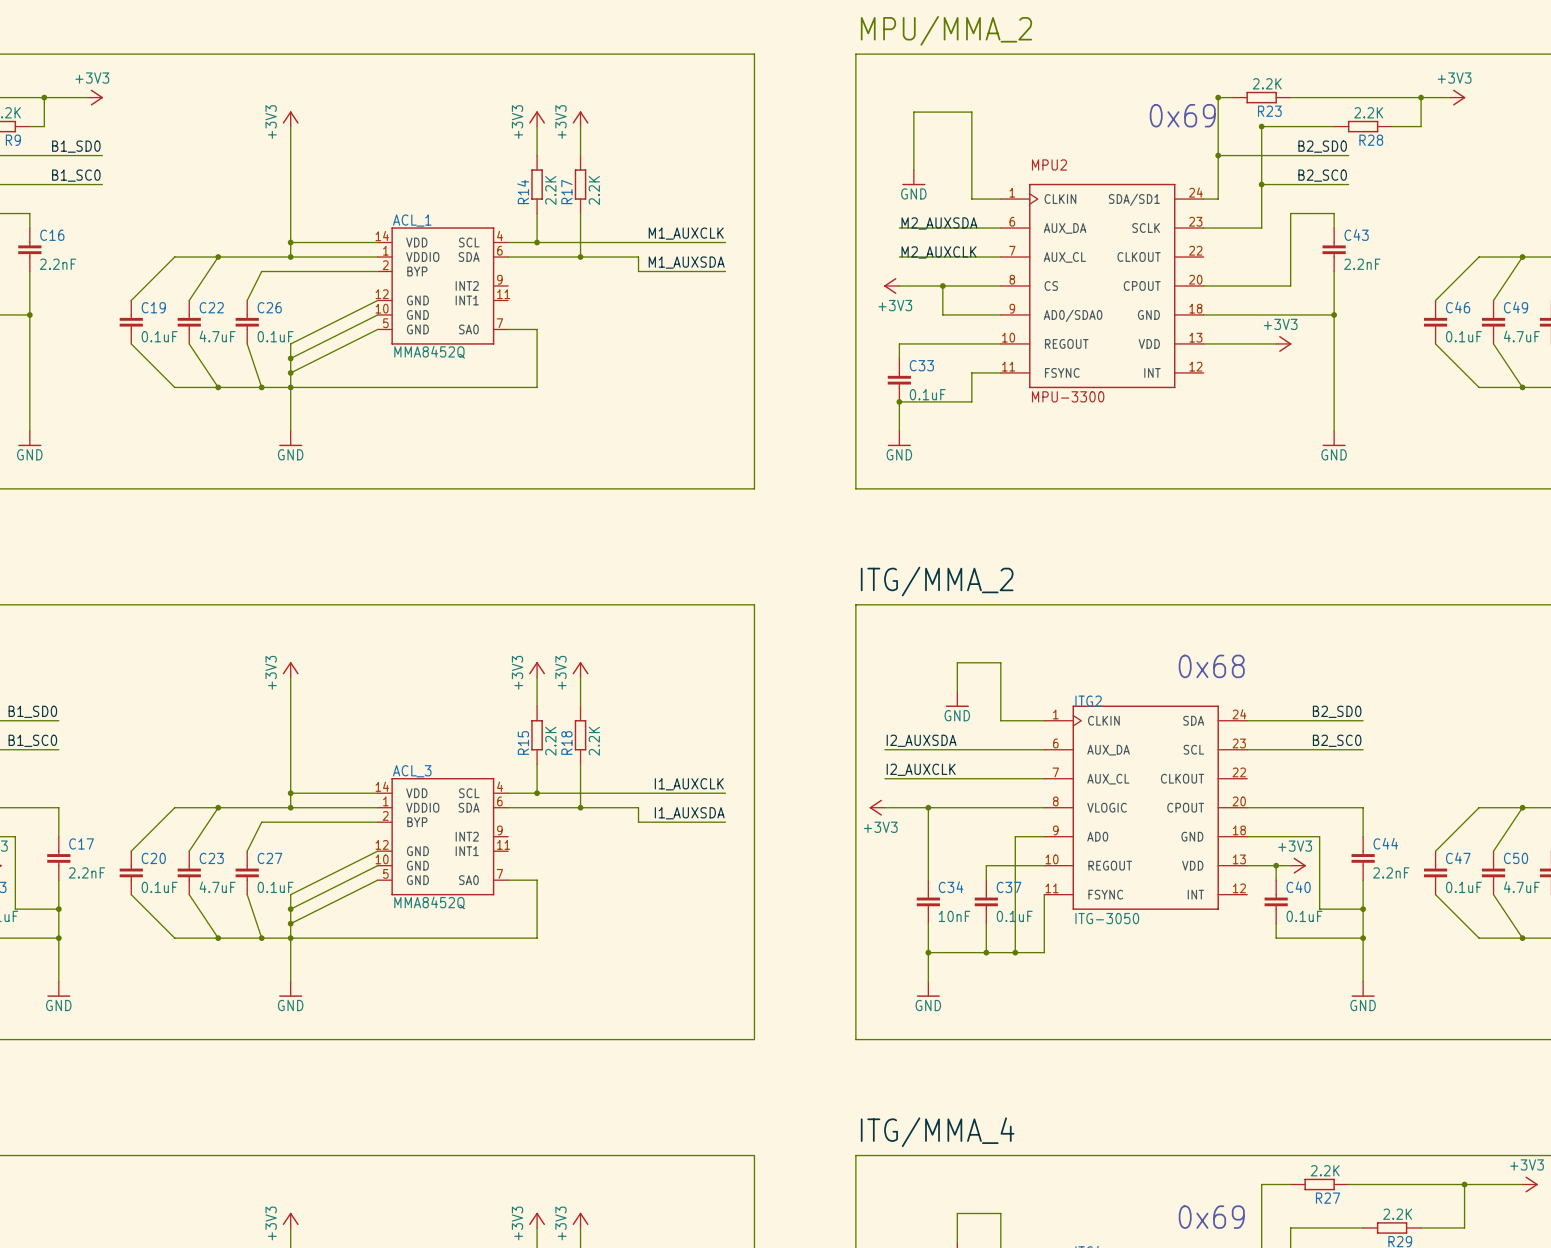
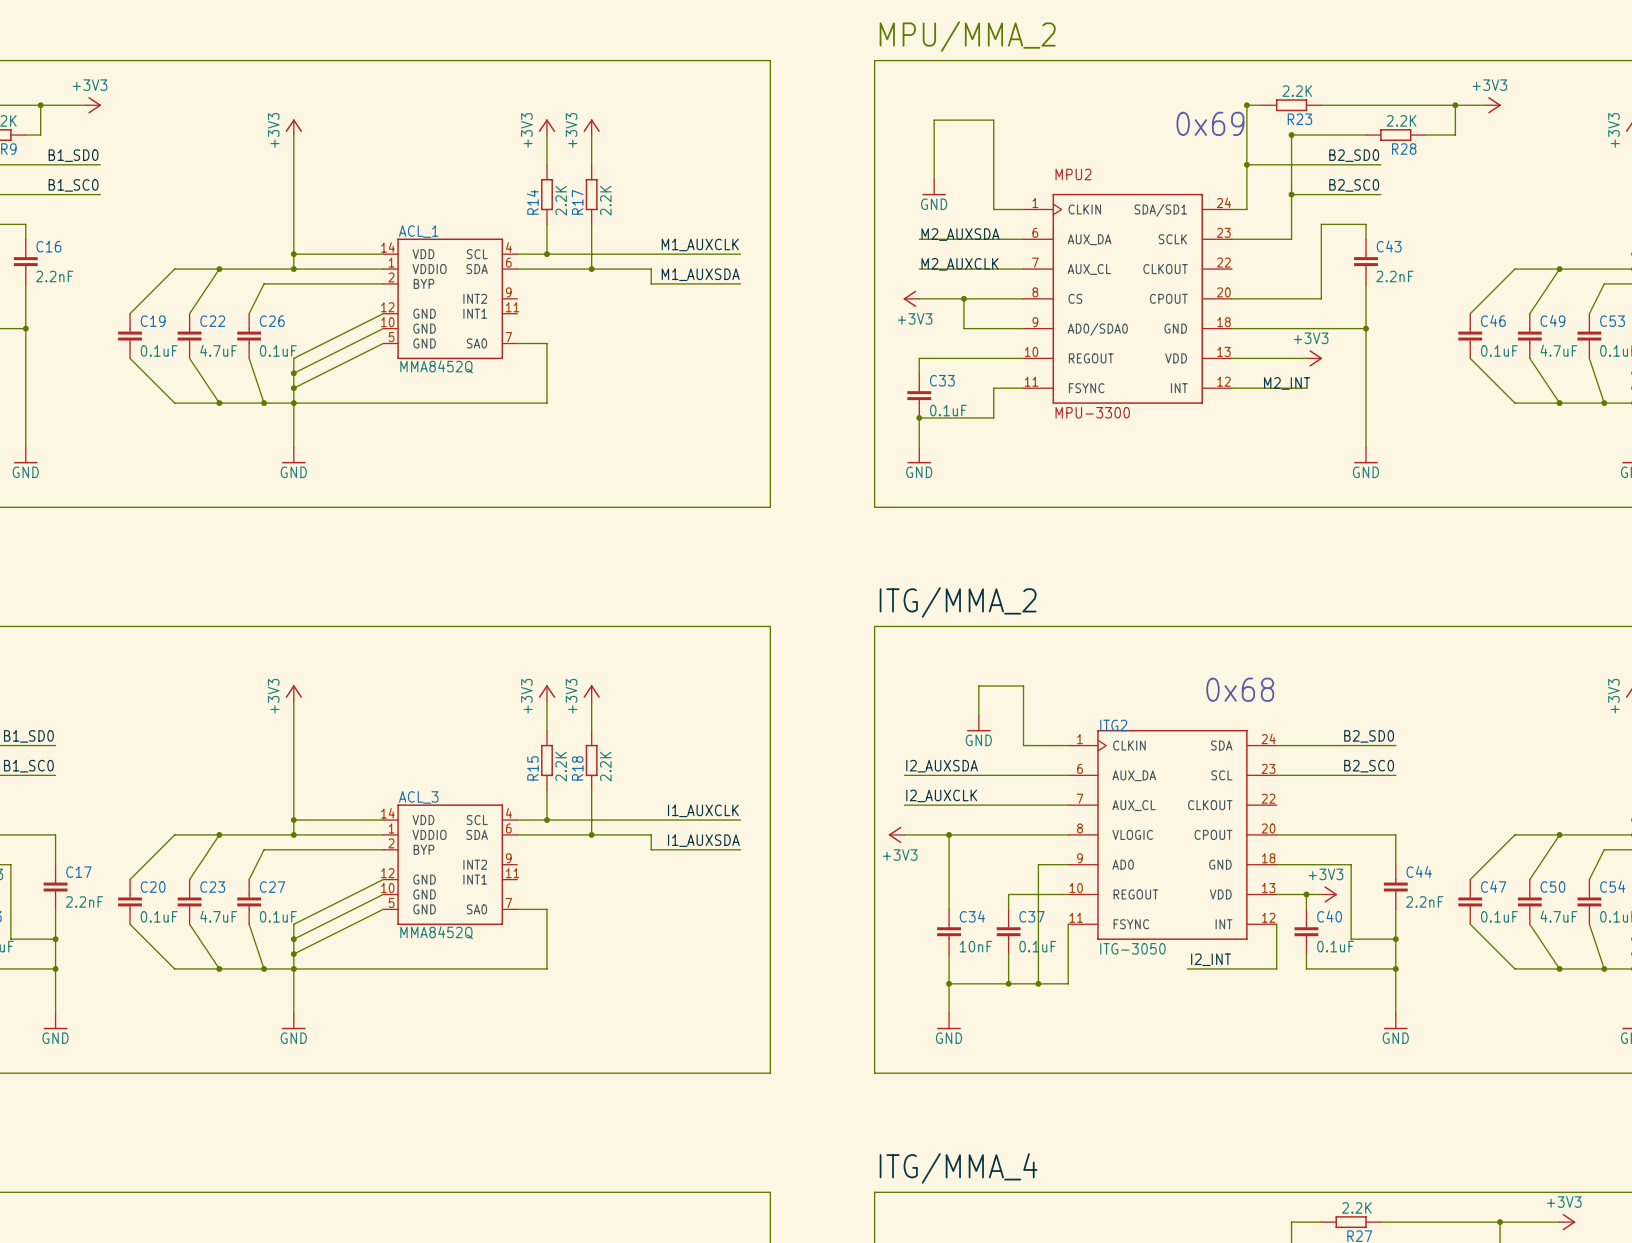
label: none -> M2_INT (1287, 383)
wire: none -> (1232, 388) (1306, 388)
wire: none -> (1276, 924) (1276, 968) (1187, 968)
label: none -> I2_INT (1211, 959)

